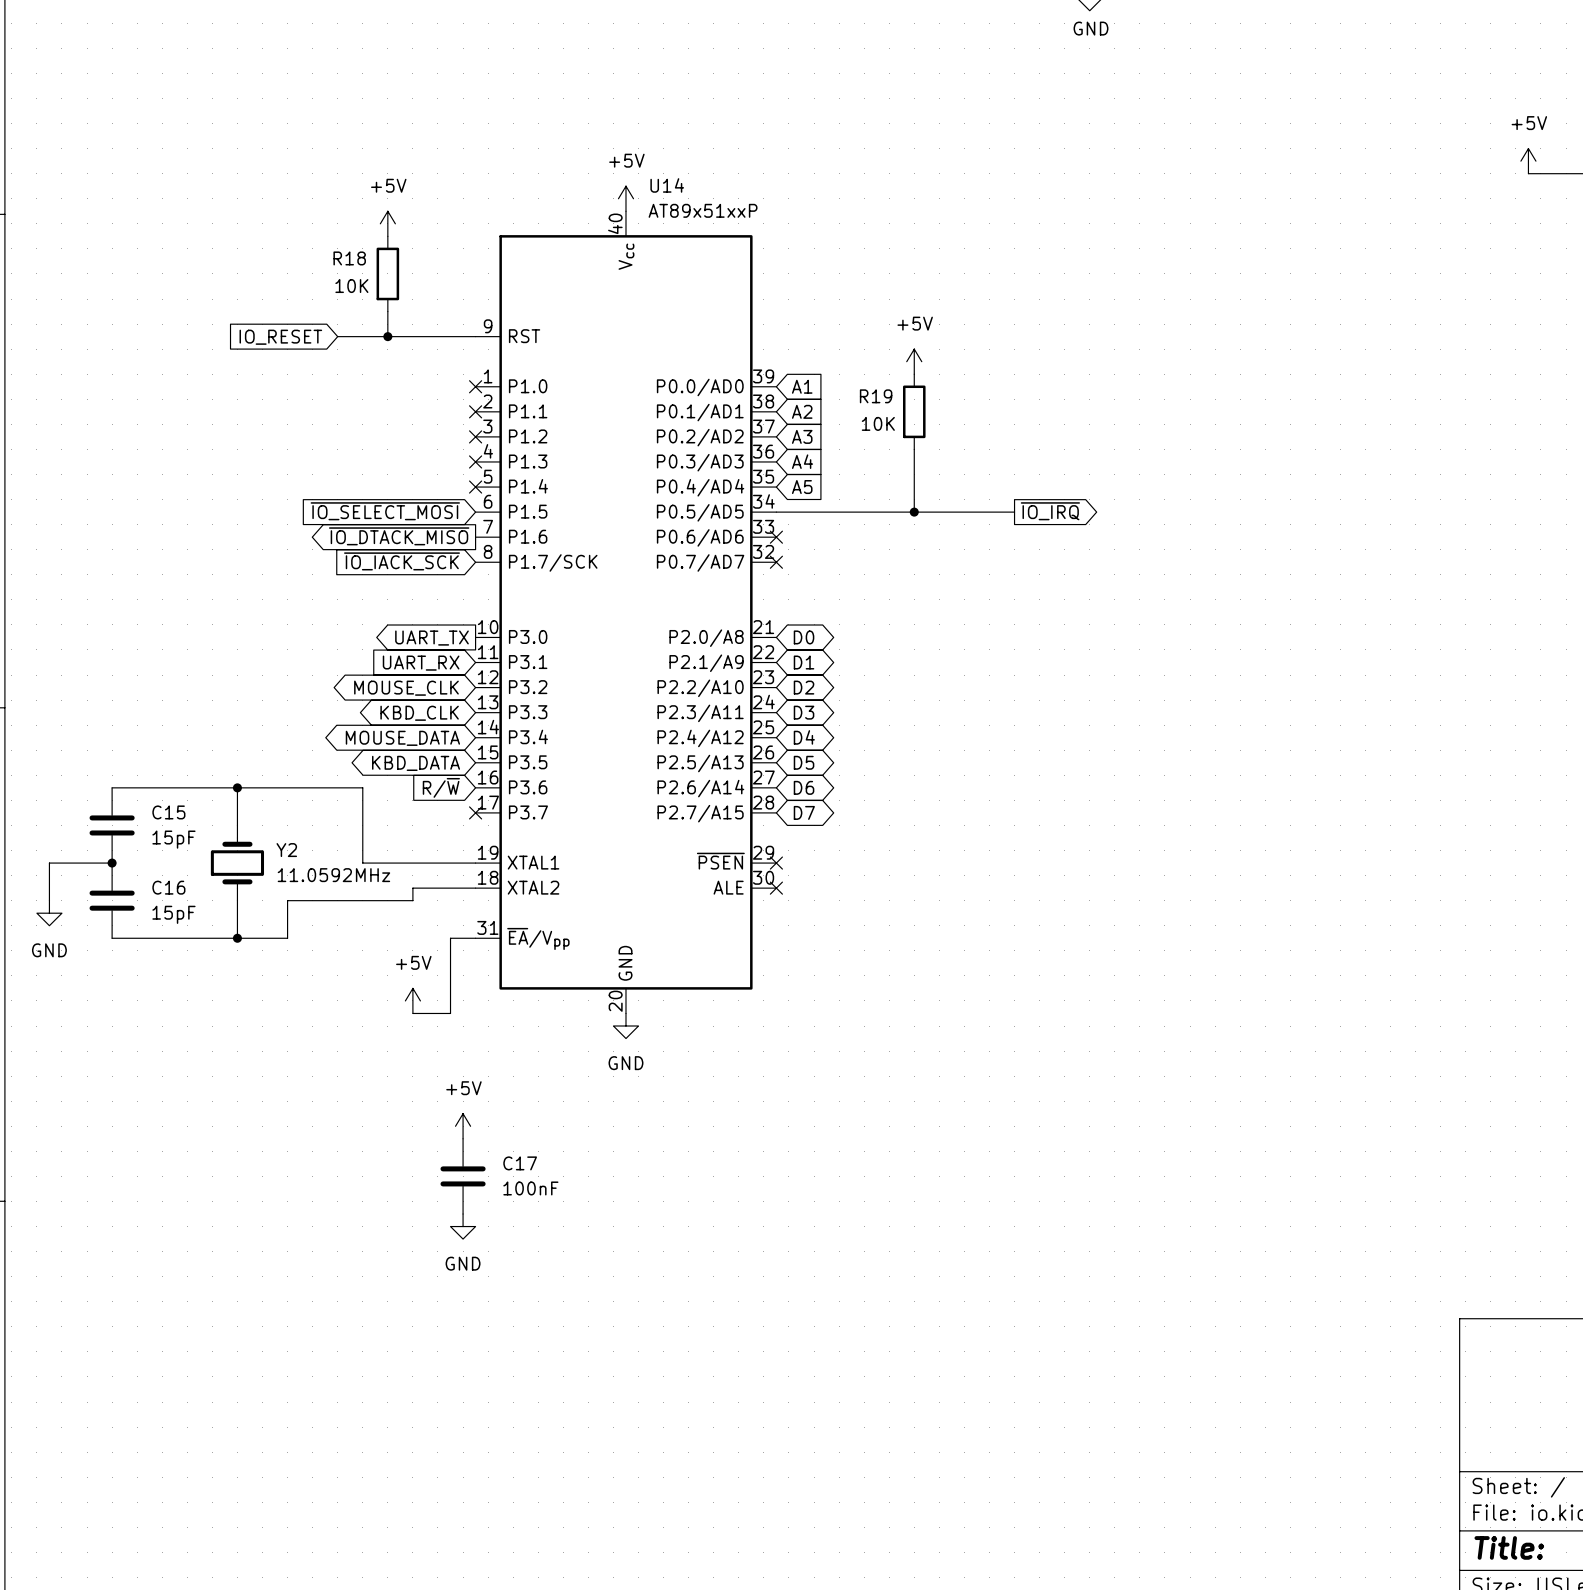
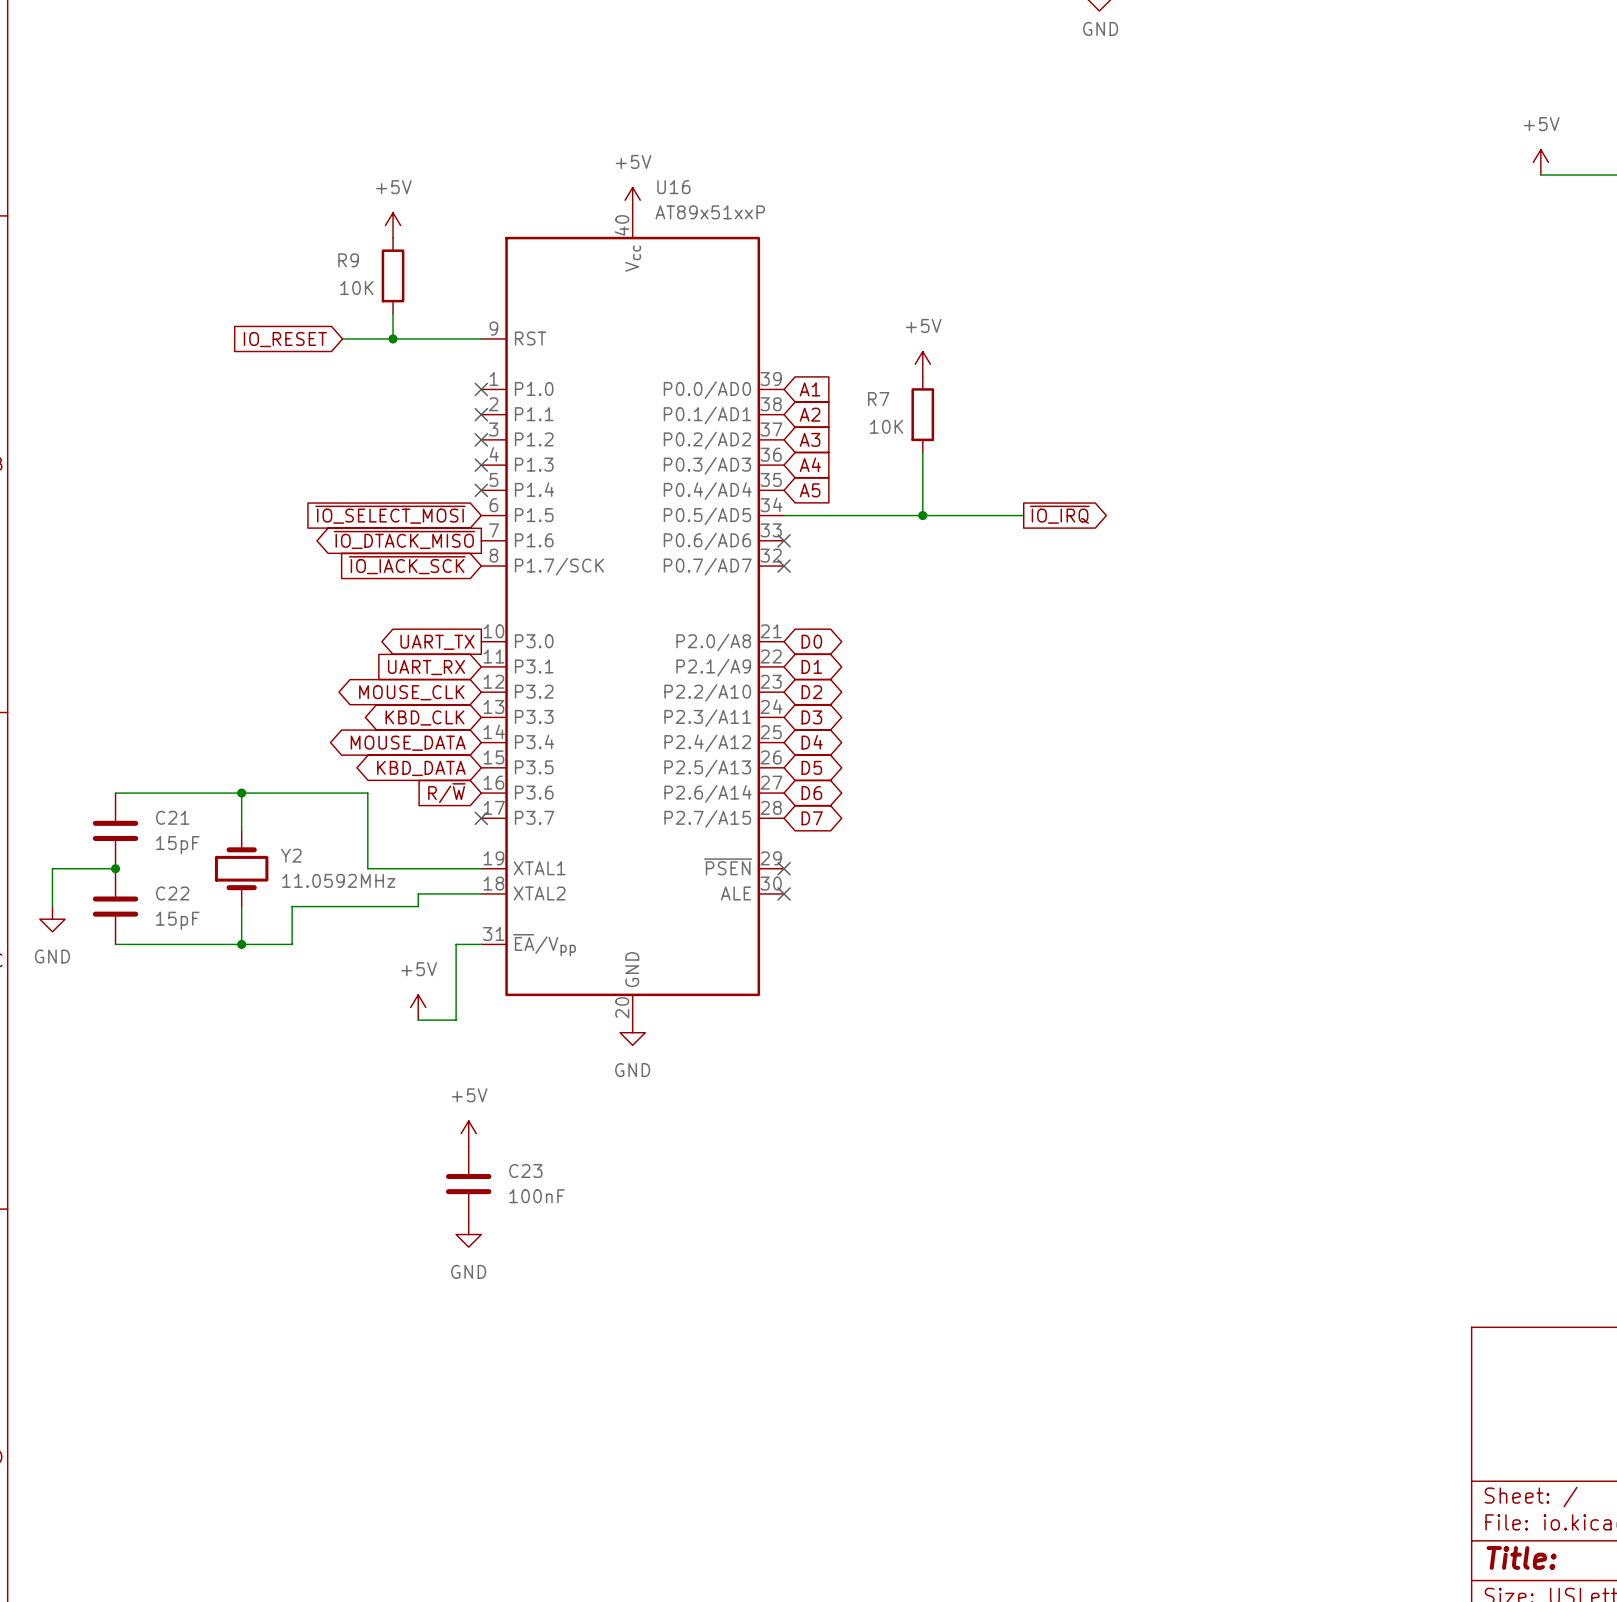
U14 name: U14 (667, 185) -> U16 (673, 187)
R18 name: R18 (349, 258) -> R9 (348, 260)
R19 name: R19 (876, 396) -> R7 (878, 399)
C15 name: C15 (168, 812) -> C21 (172, 817)
C16 name: C16 (168, 887) -> C22 (172, 893)
C17 name: C17 (520, 1163) -> C23 (525, 1170)

